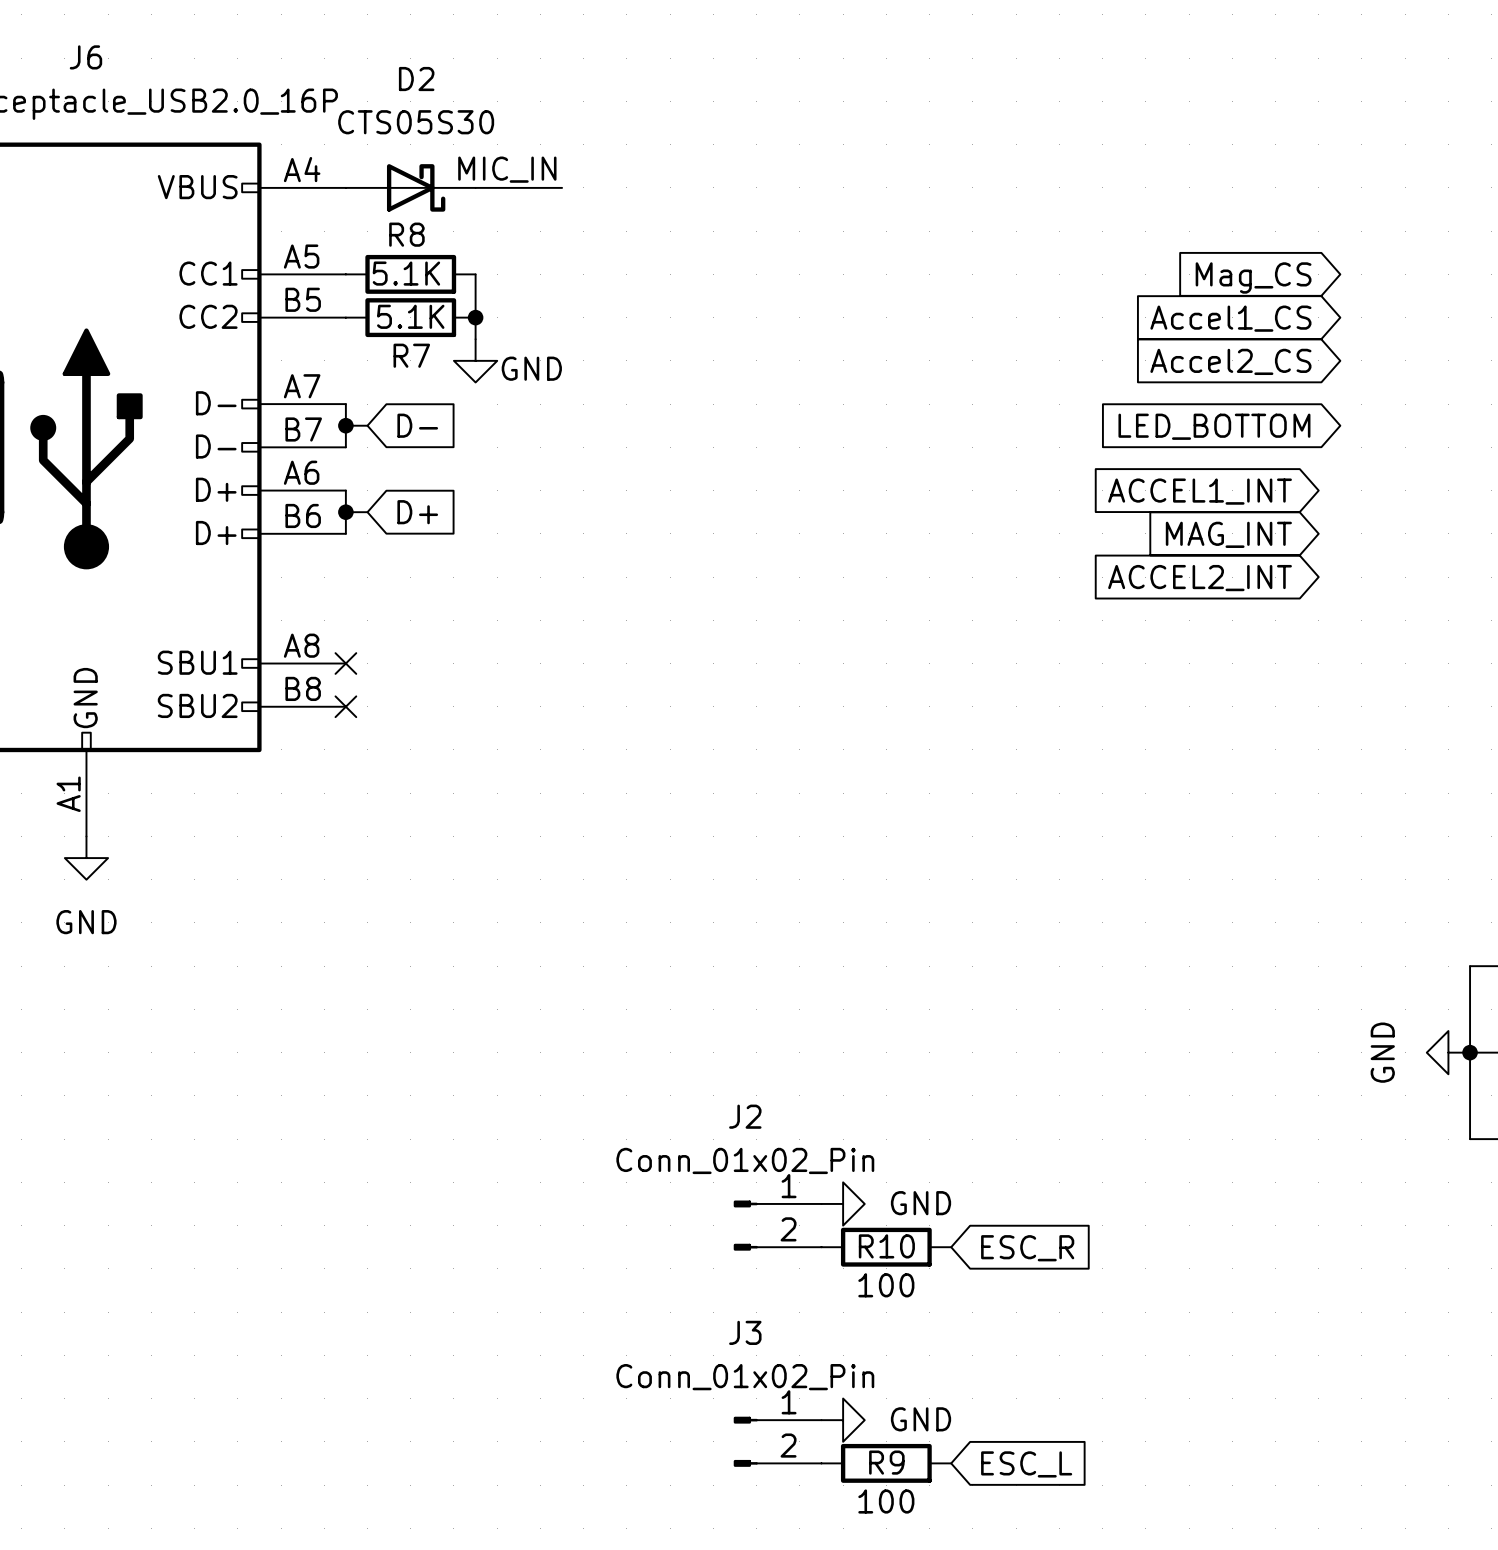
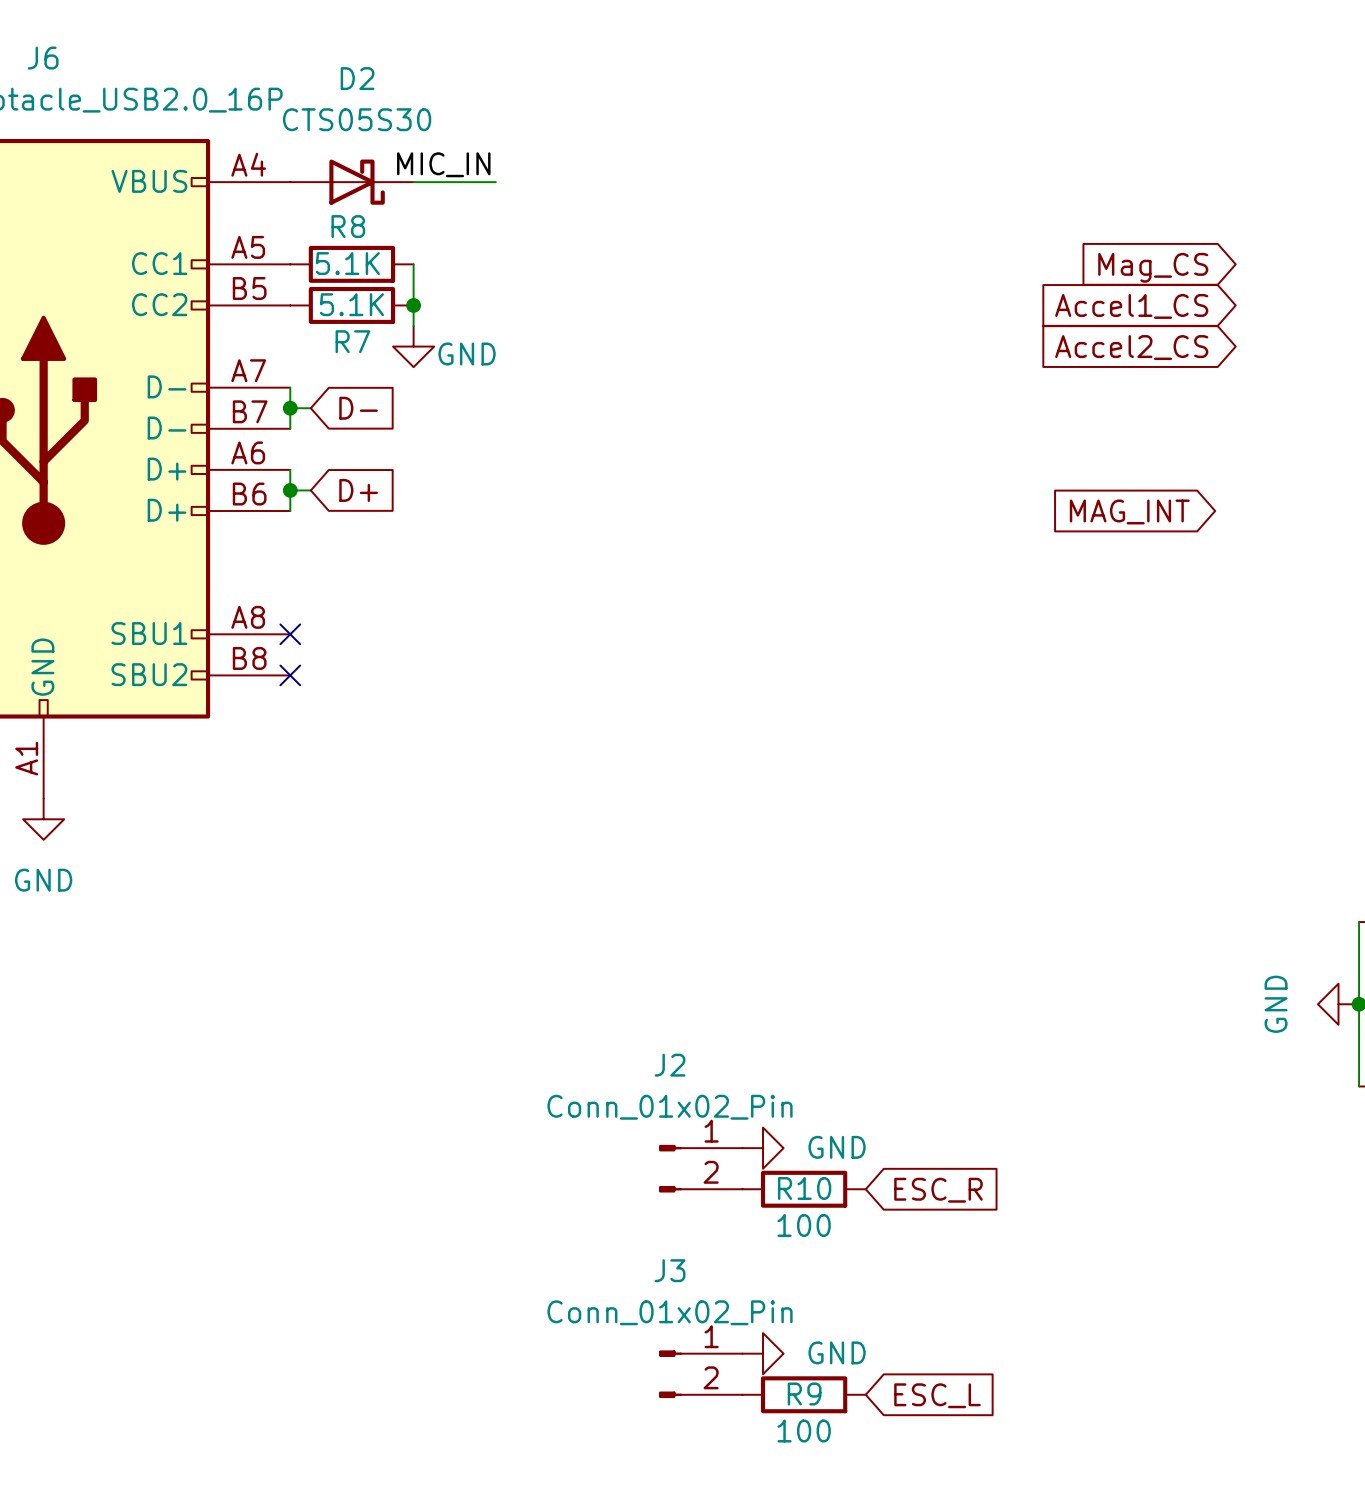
global label: LED_BOTTOM (1214, 426) -> none
global label: ACCEL1_INT (1200, 491) -> none
global label: ACCEL2_INT (1200, 578) -> none

